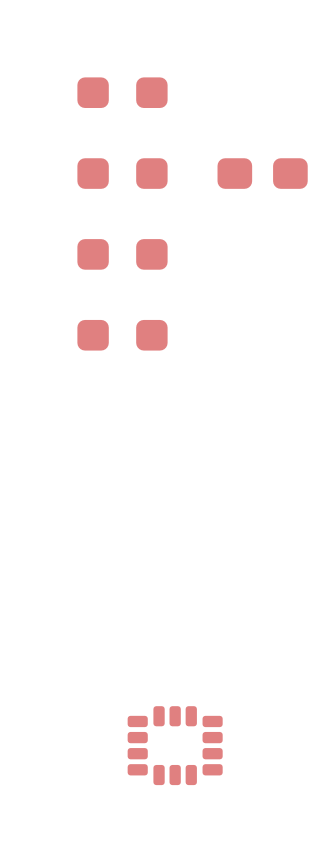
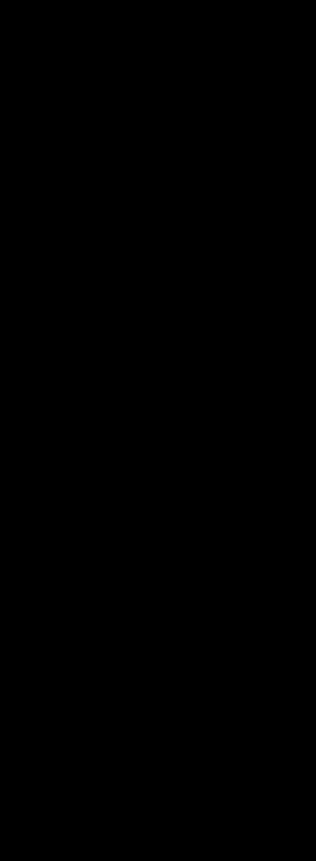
part: (122, 92) -> none
part: (122, 173) -> none
part: (262, 173) -> none
part: (122, 254) -> none
part: (122, 335) -> none
part: (175, 745) -> none

